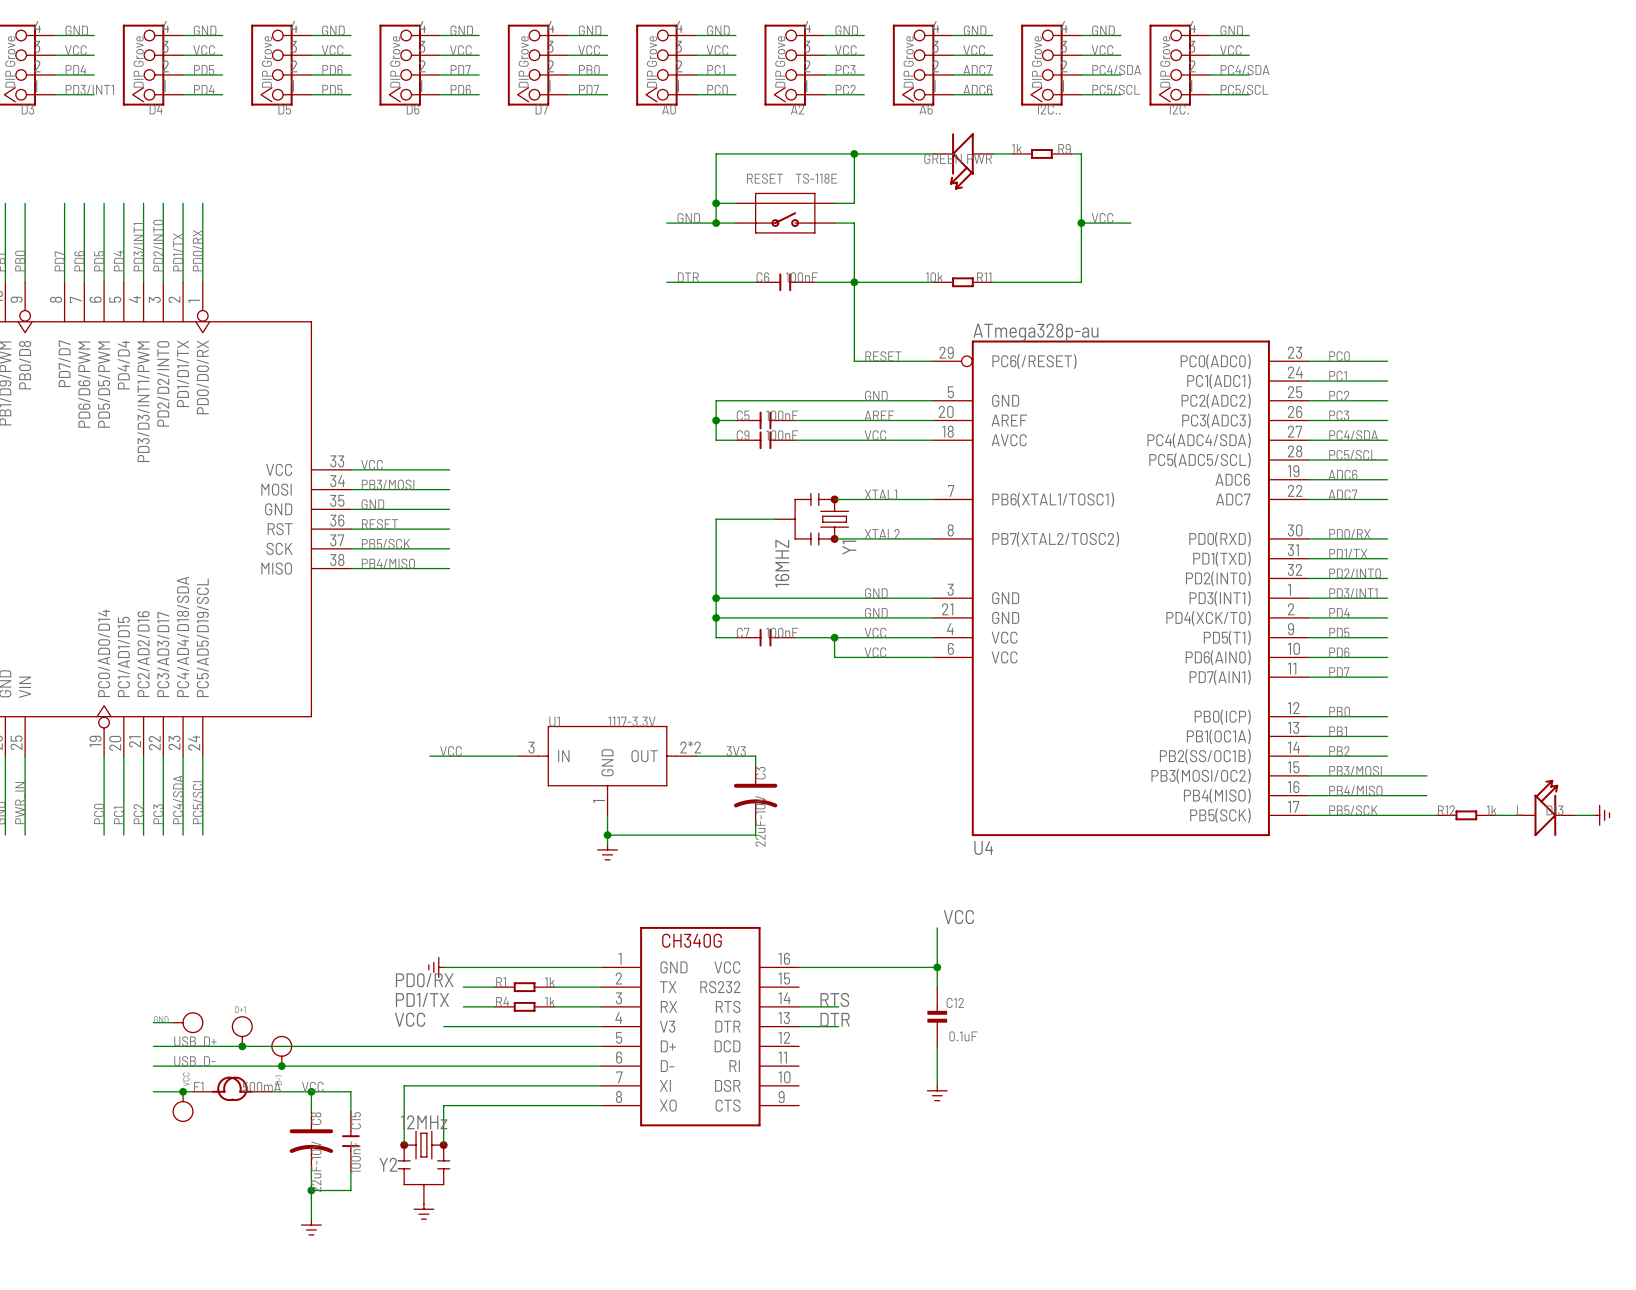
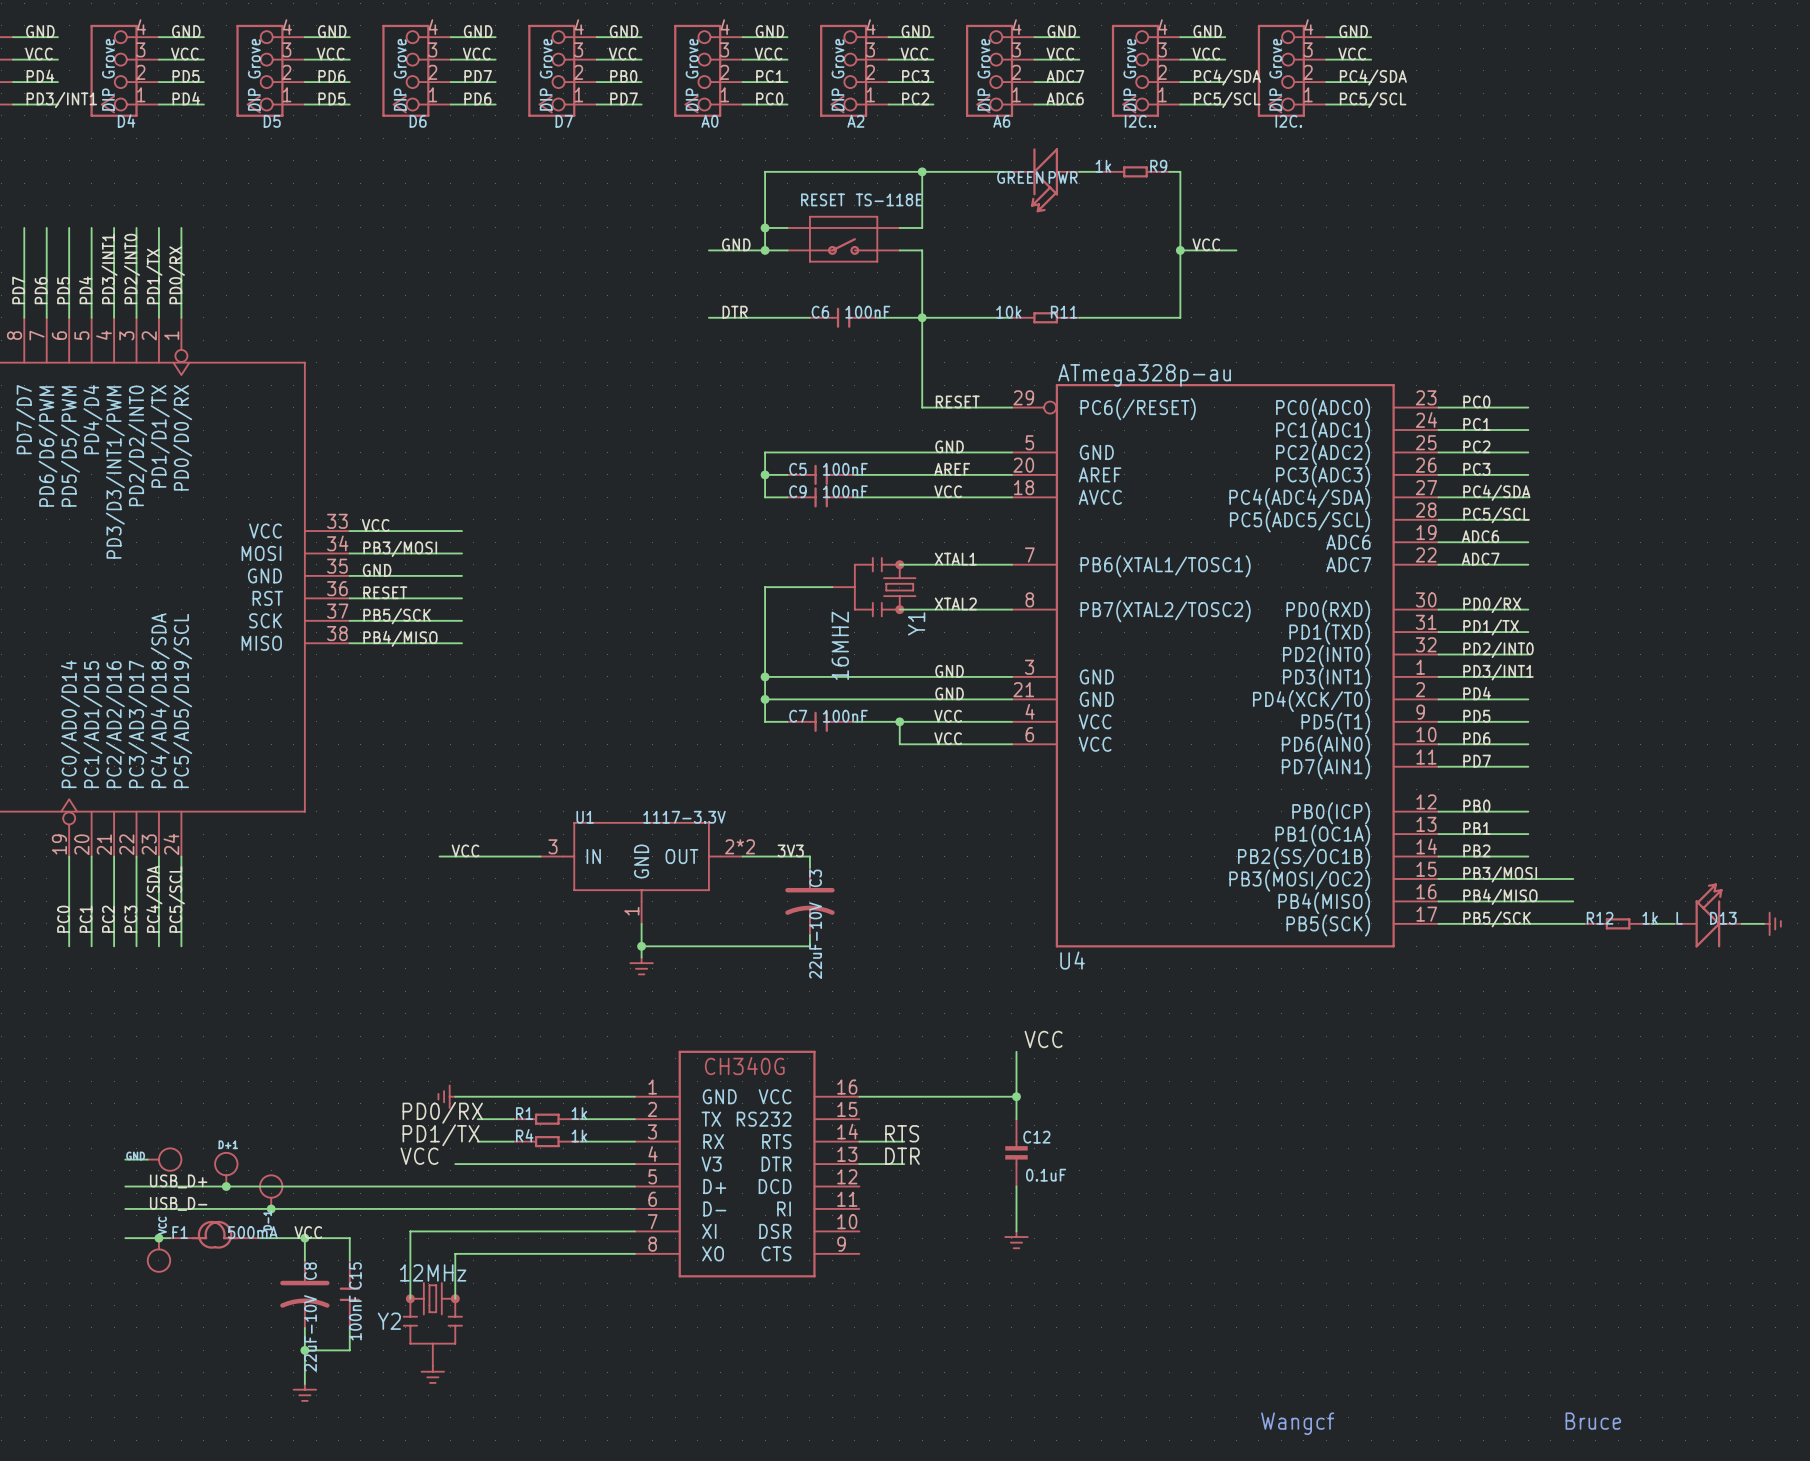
text: none -> Bruce (1593, 1421)
text: none -> Wangcf (1297, 1423)

